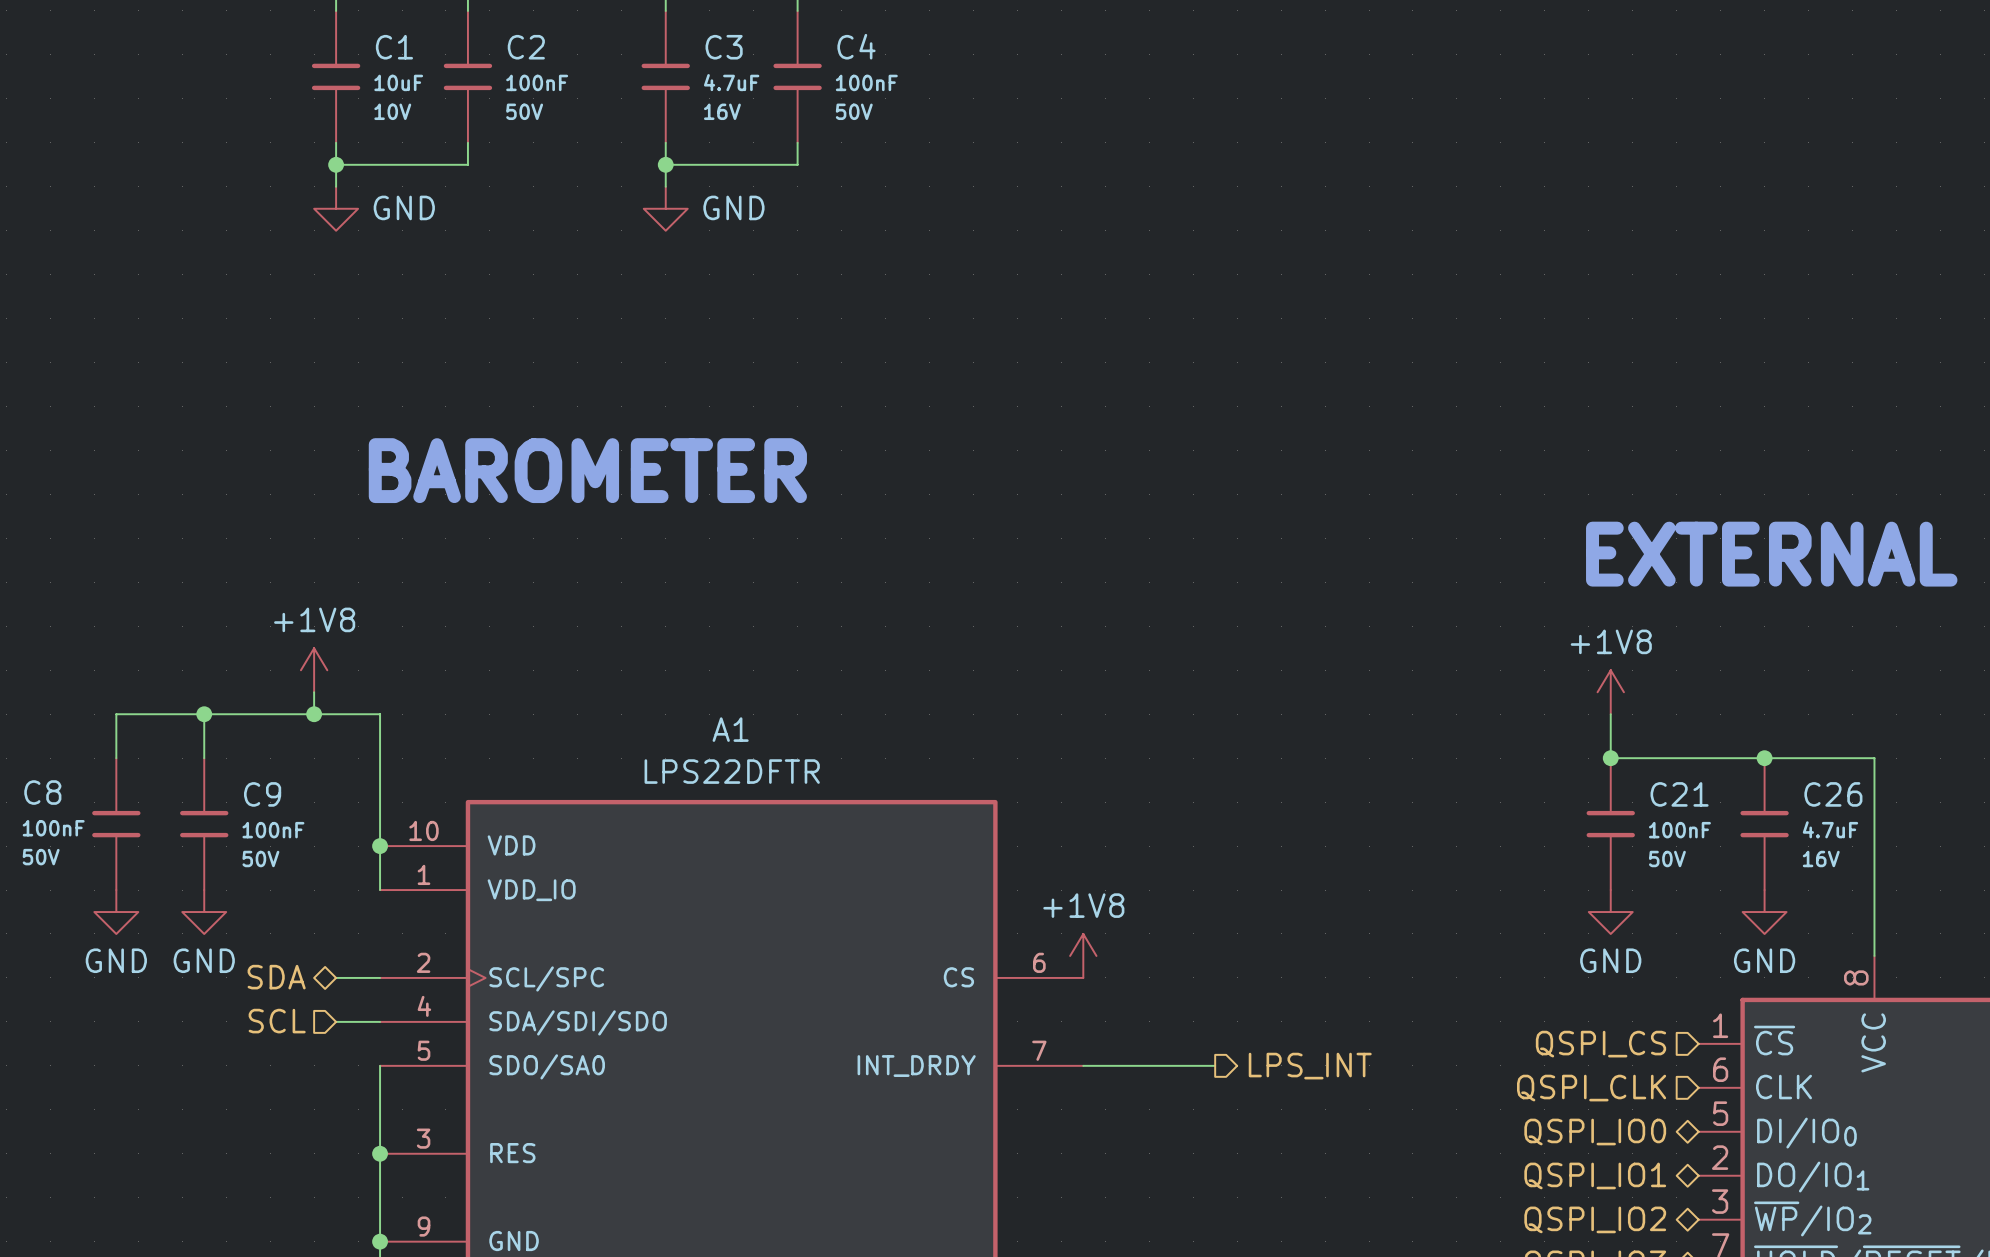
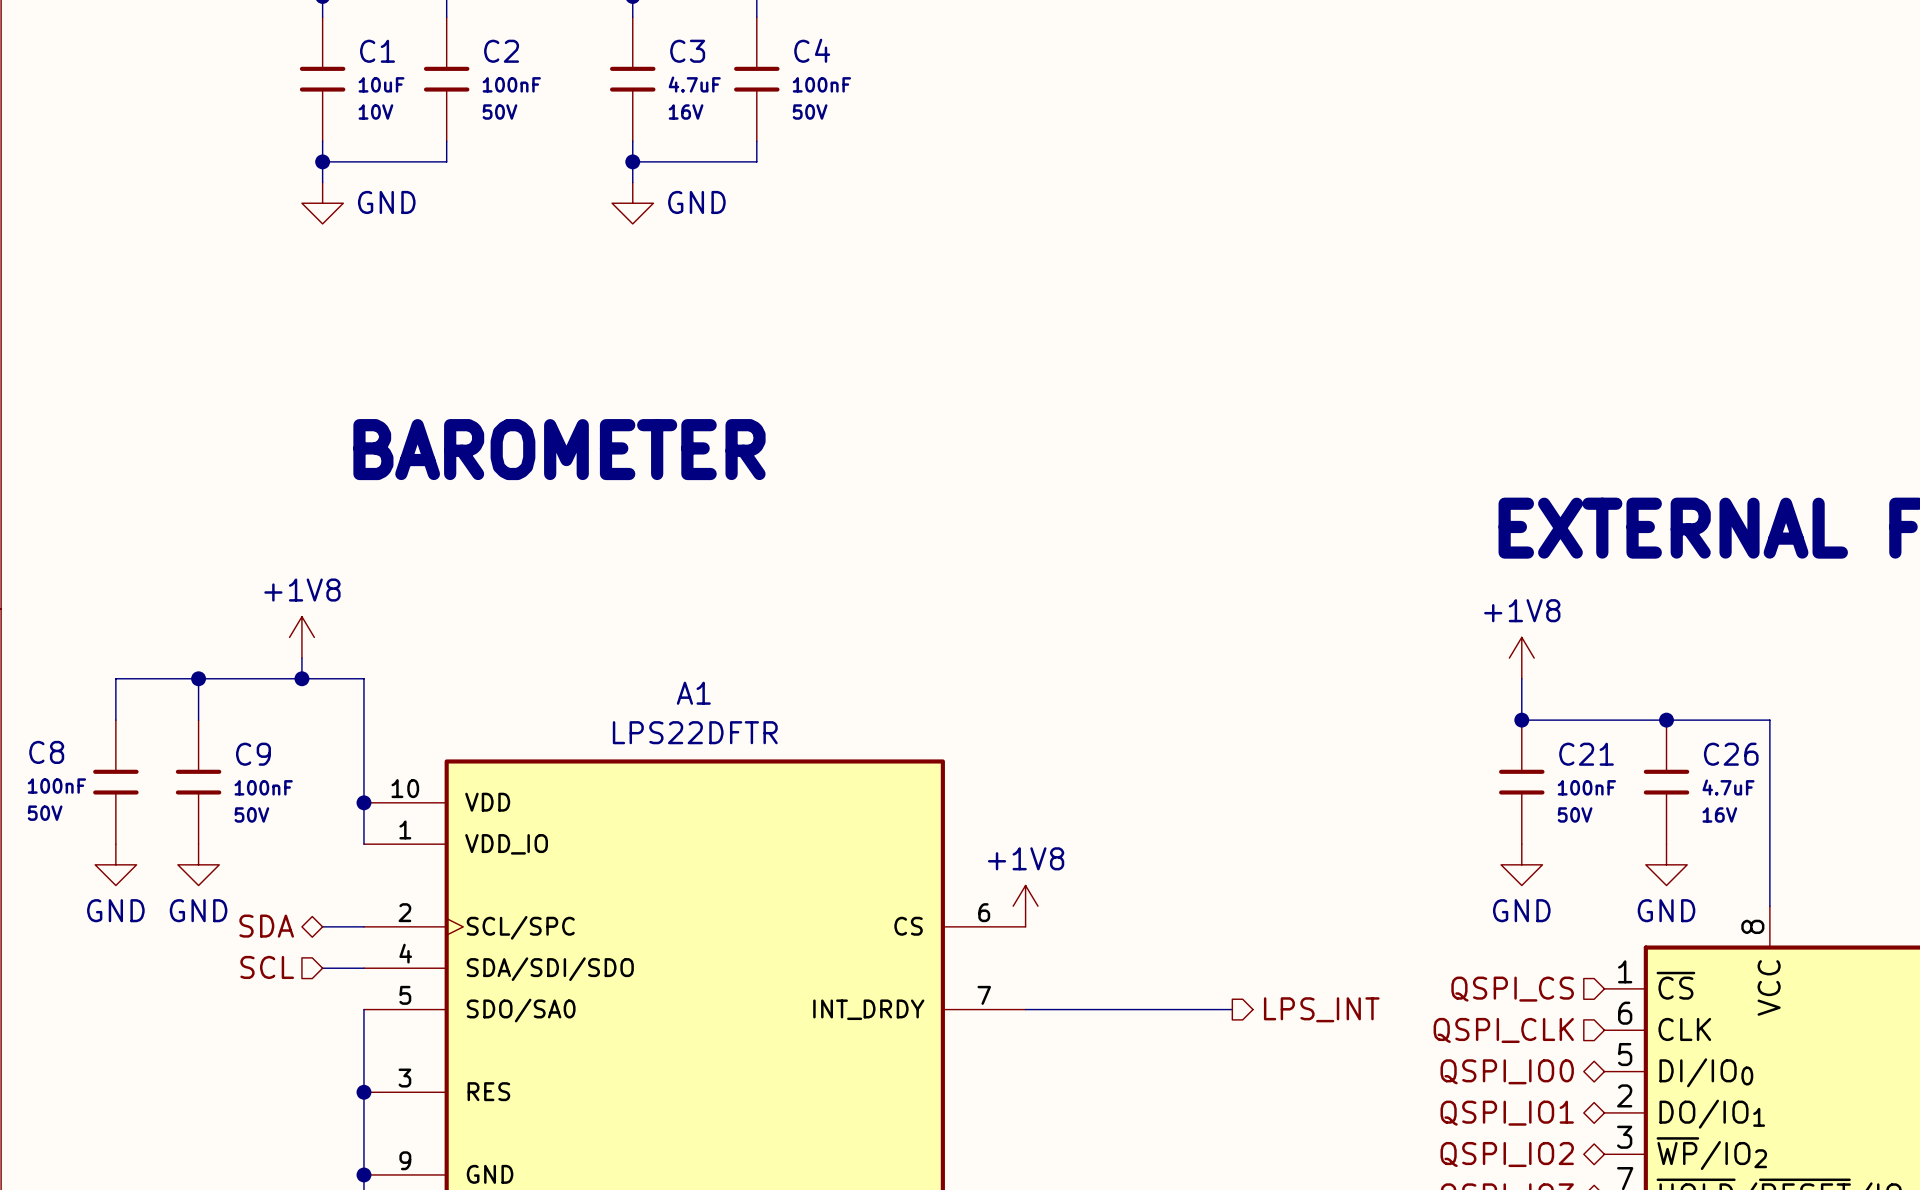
wire: none -> (1149, 1009) (1232, 1009)
hierarchical label position: LPS_INT (1310, 1066) -> LPS_INT (1321, 1009)

